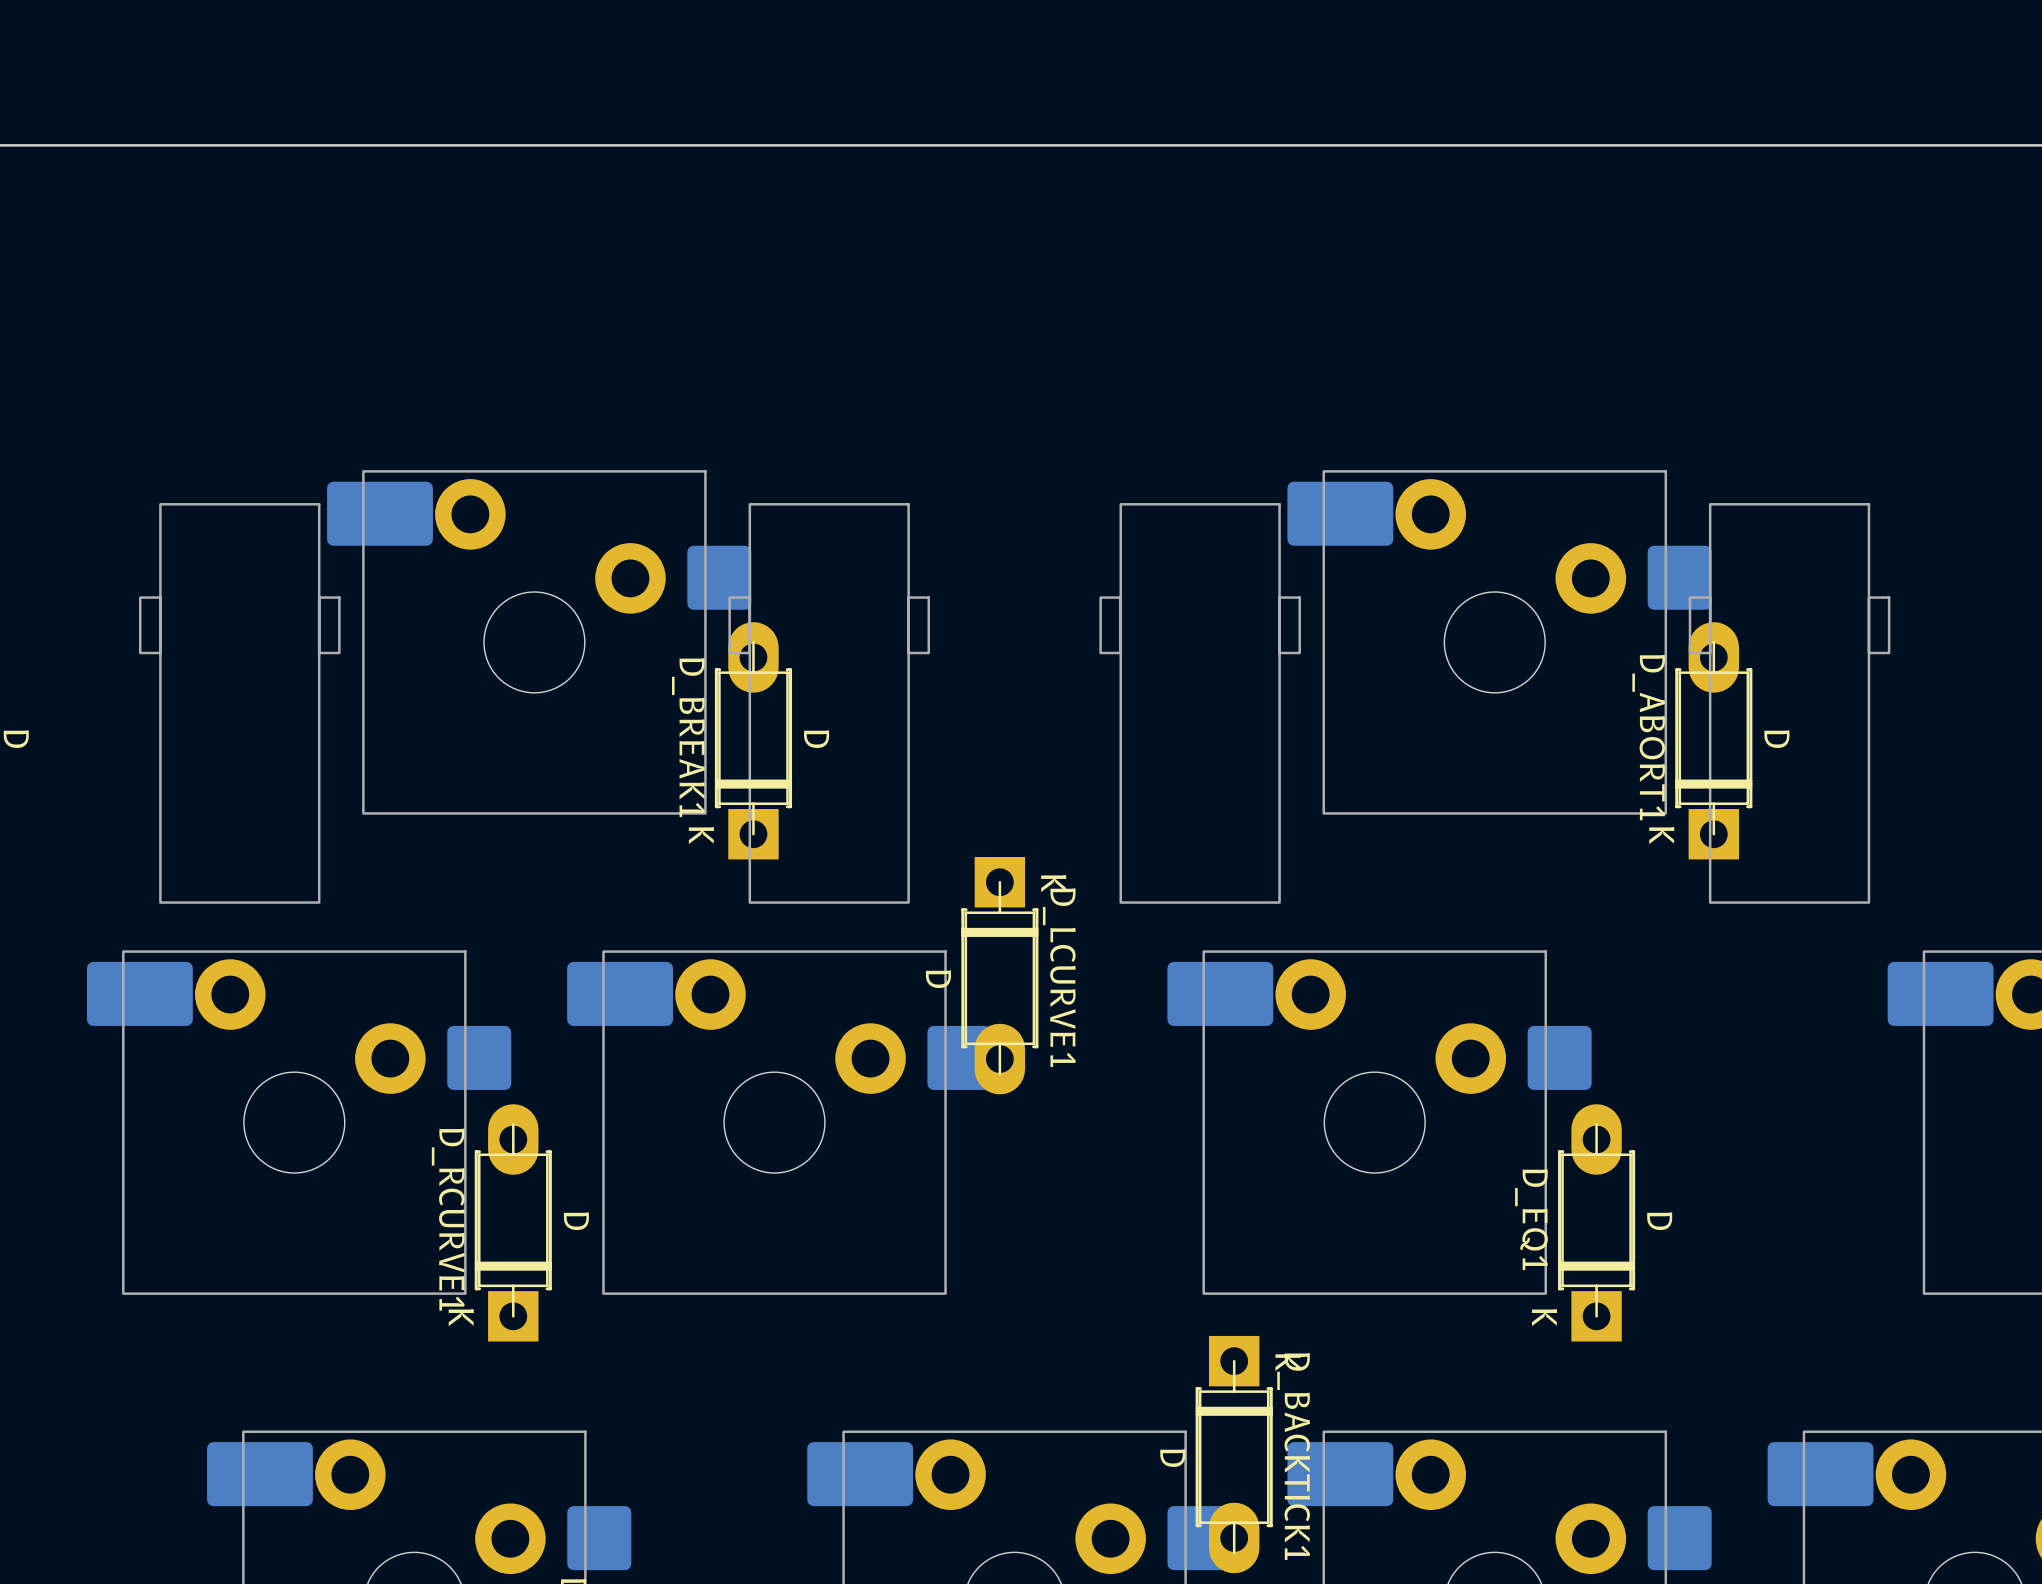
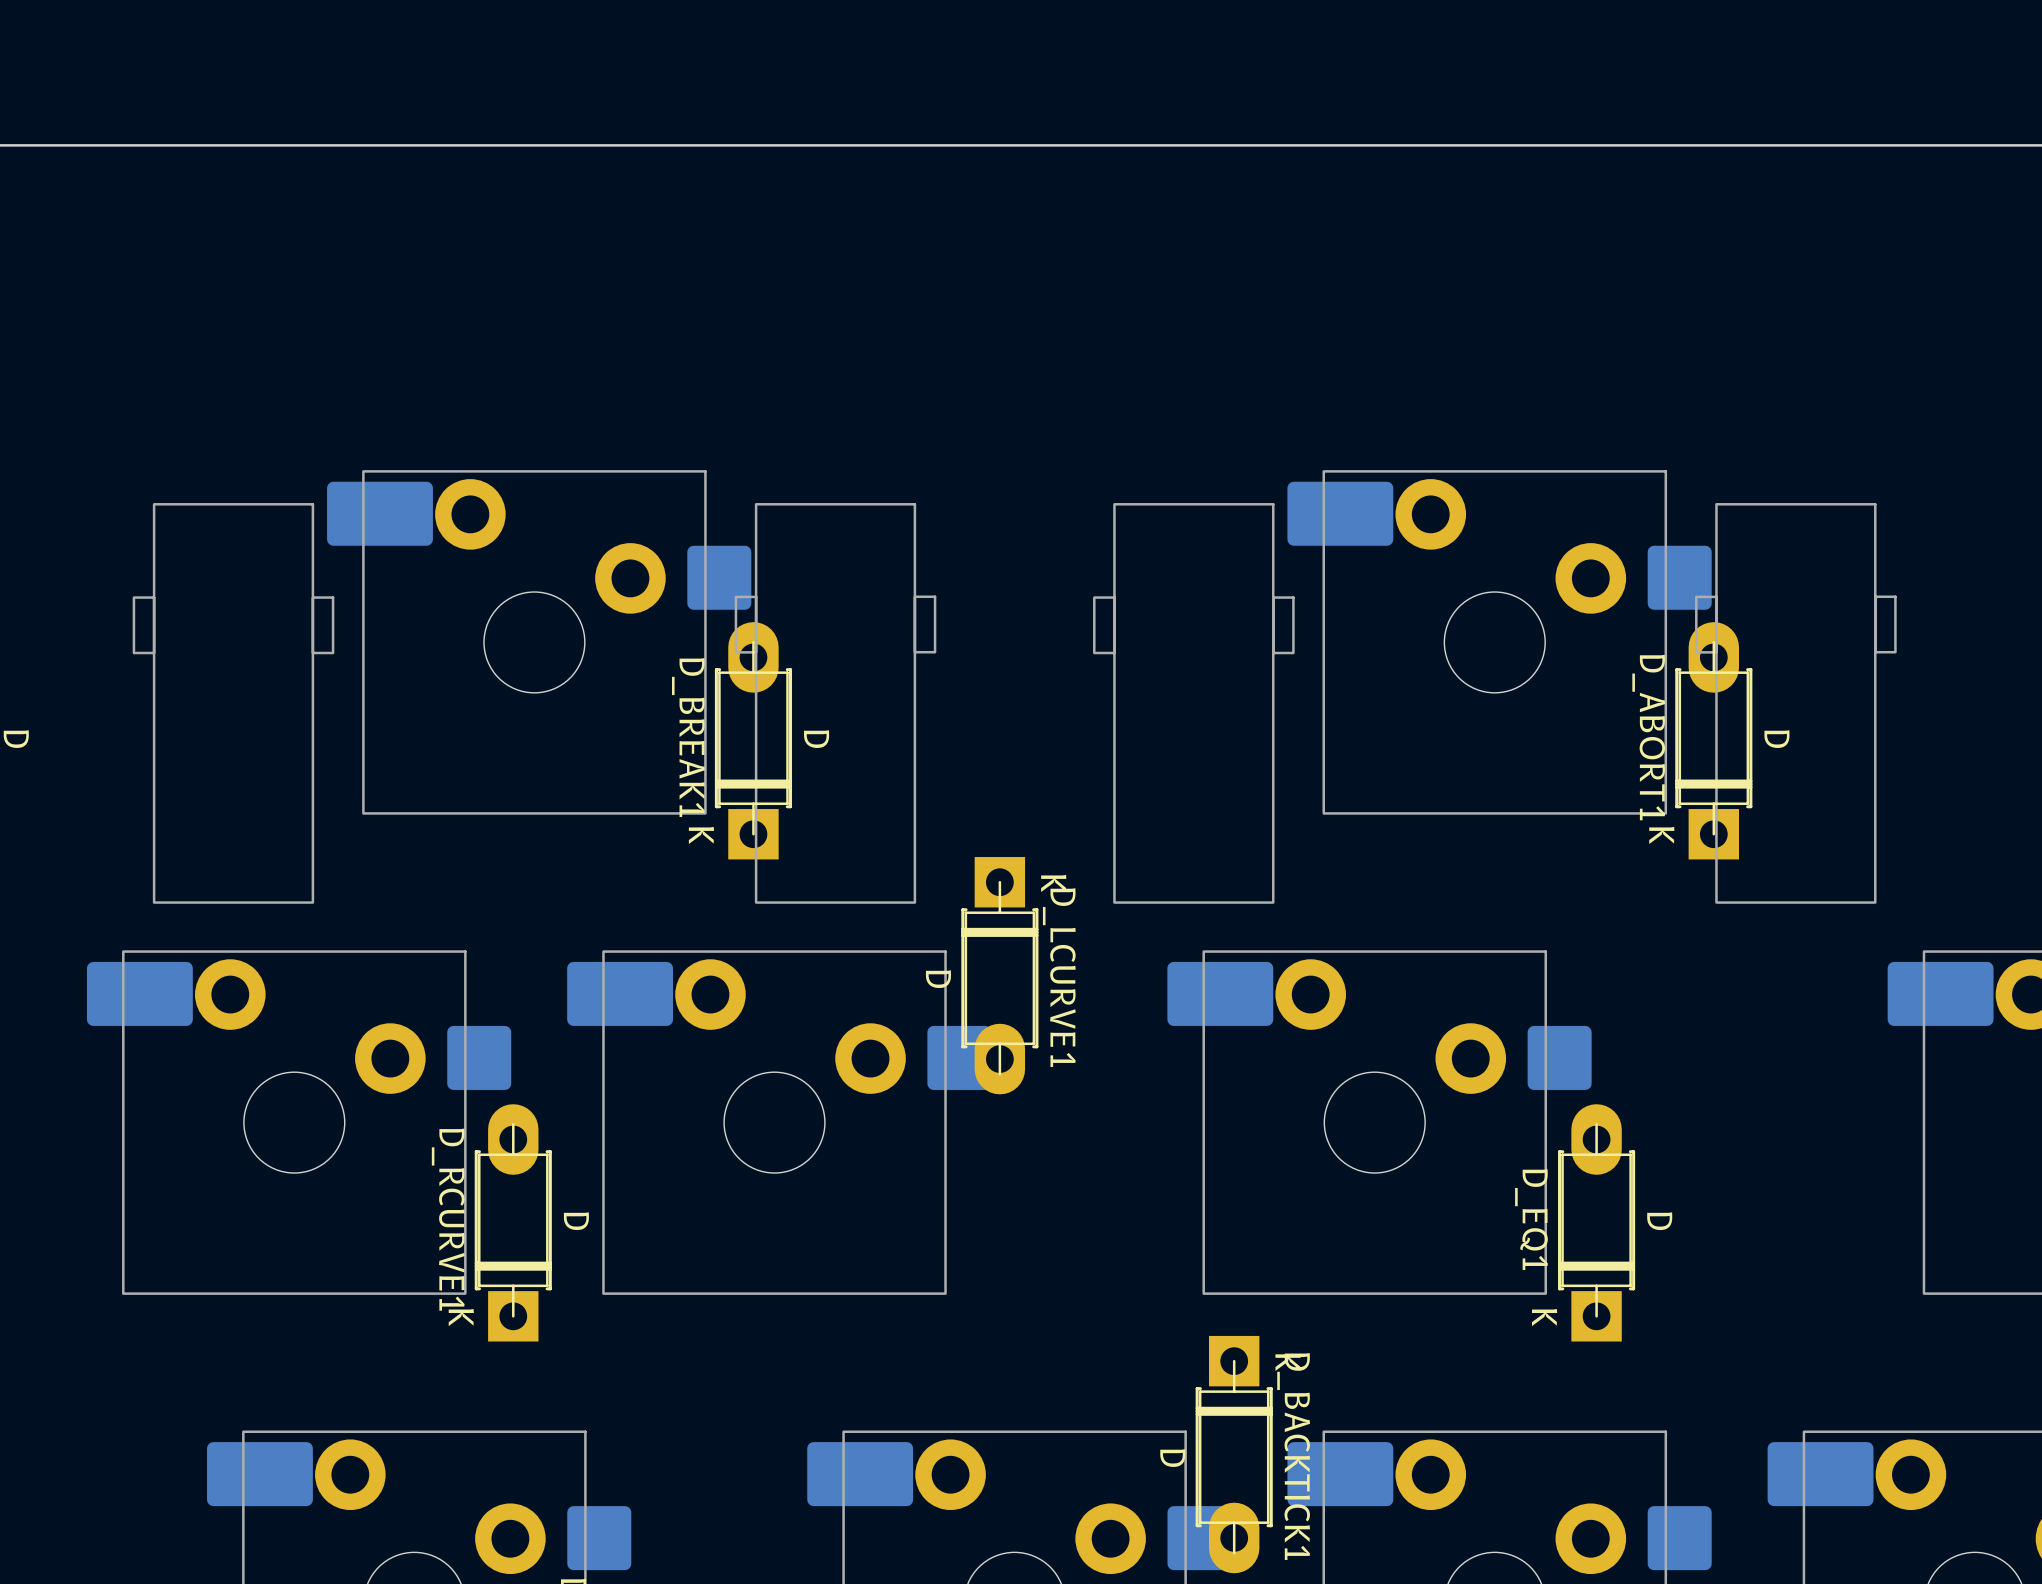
part footprint: [138, 470, 931, 904] -> [132, 470, 937, 904]
part footprint: [1099, 470, 1891, 904] -> [1093, 470, 1897, 904]

